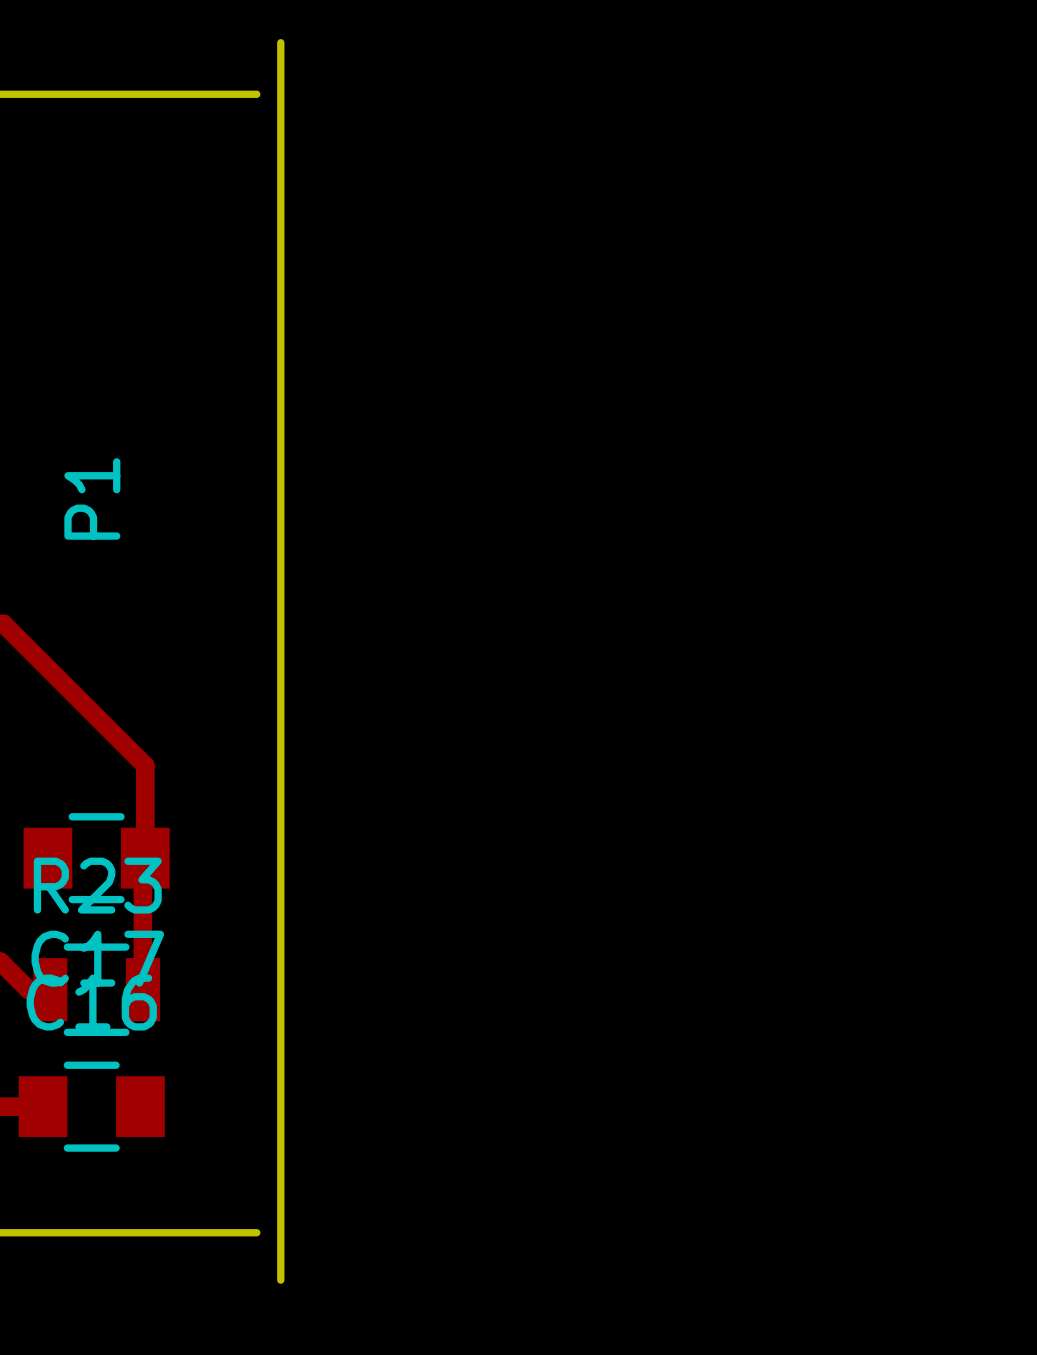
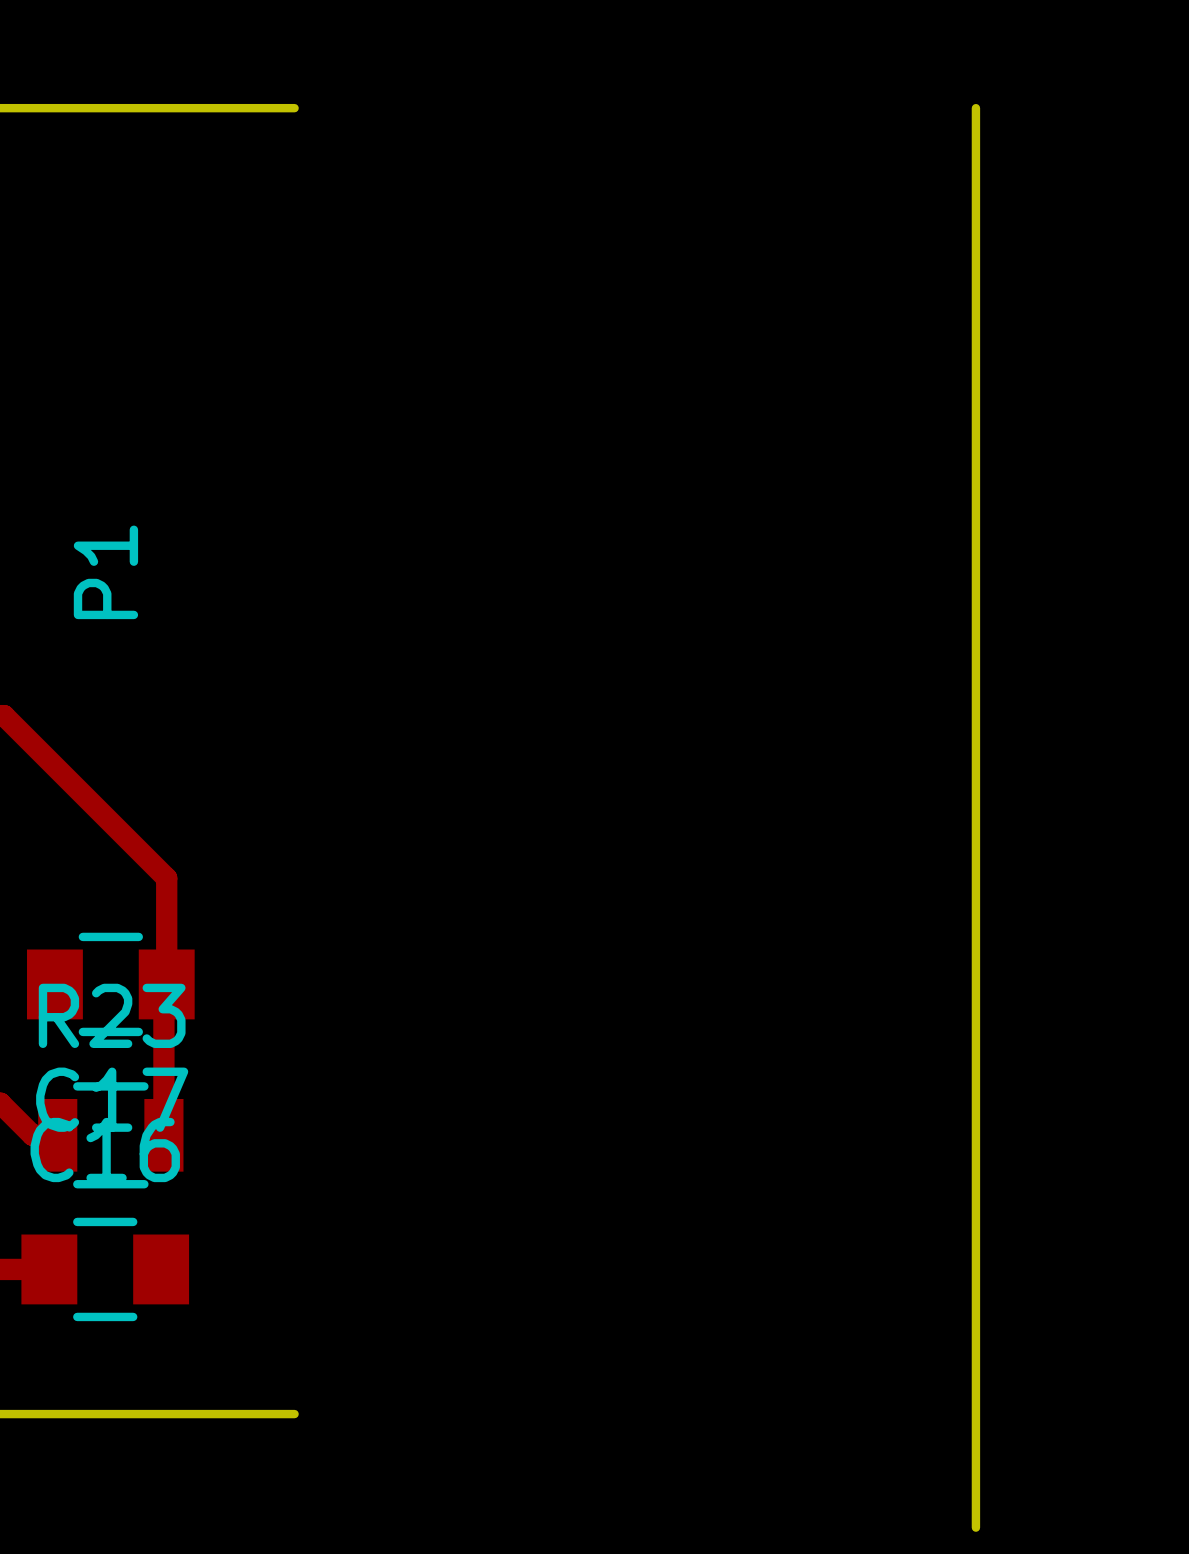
board edge: (280, 42) (280, 1280) -> (975, 108) (975, 1527)

